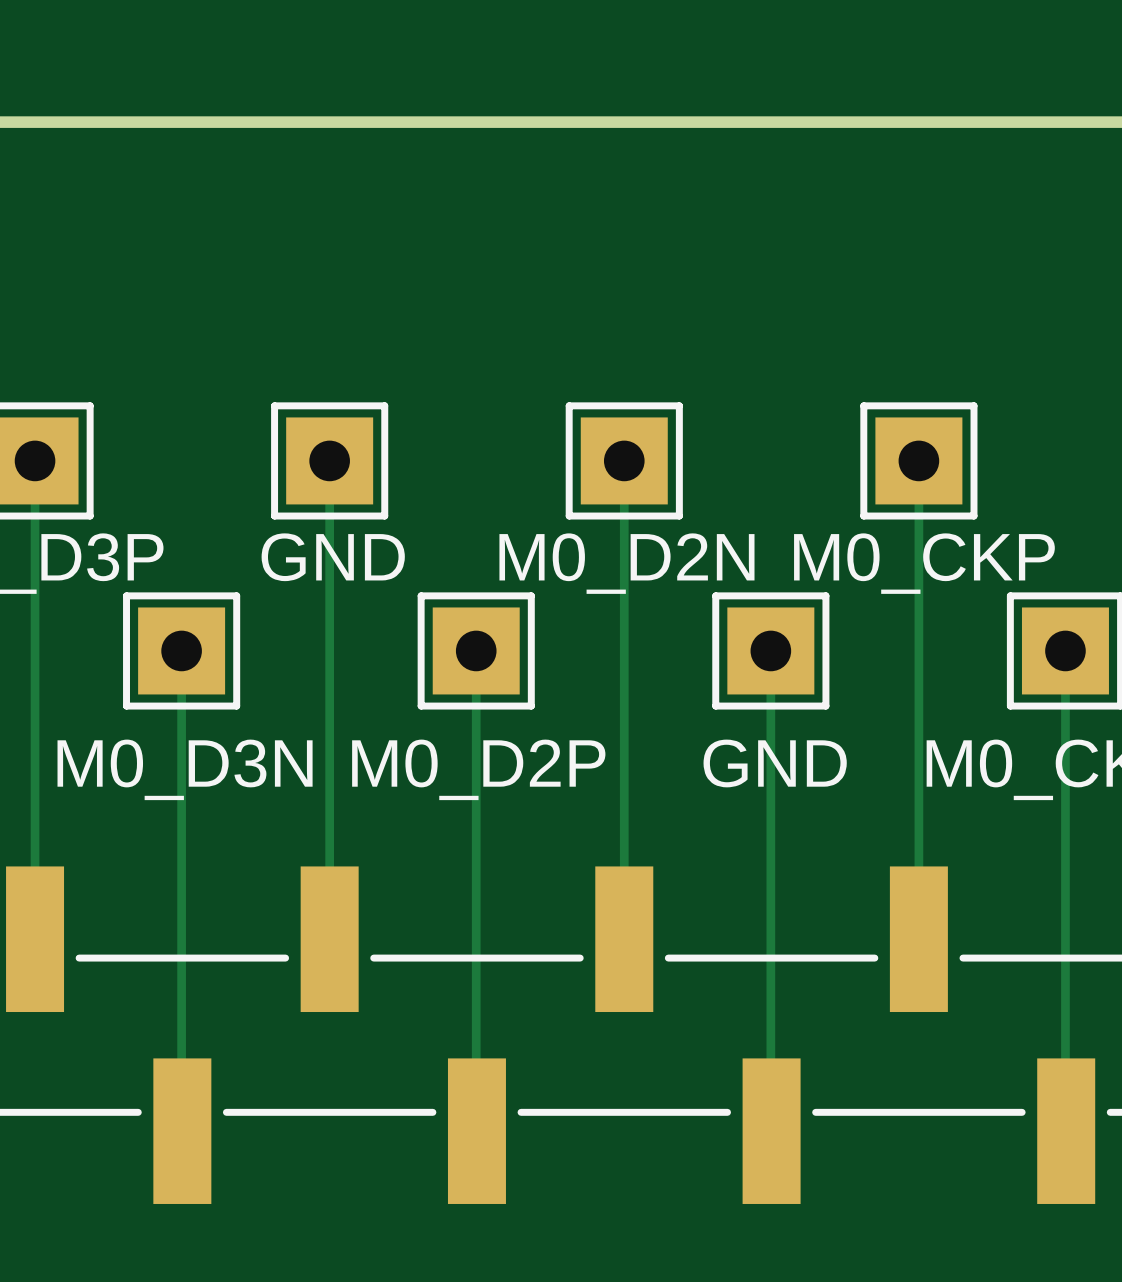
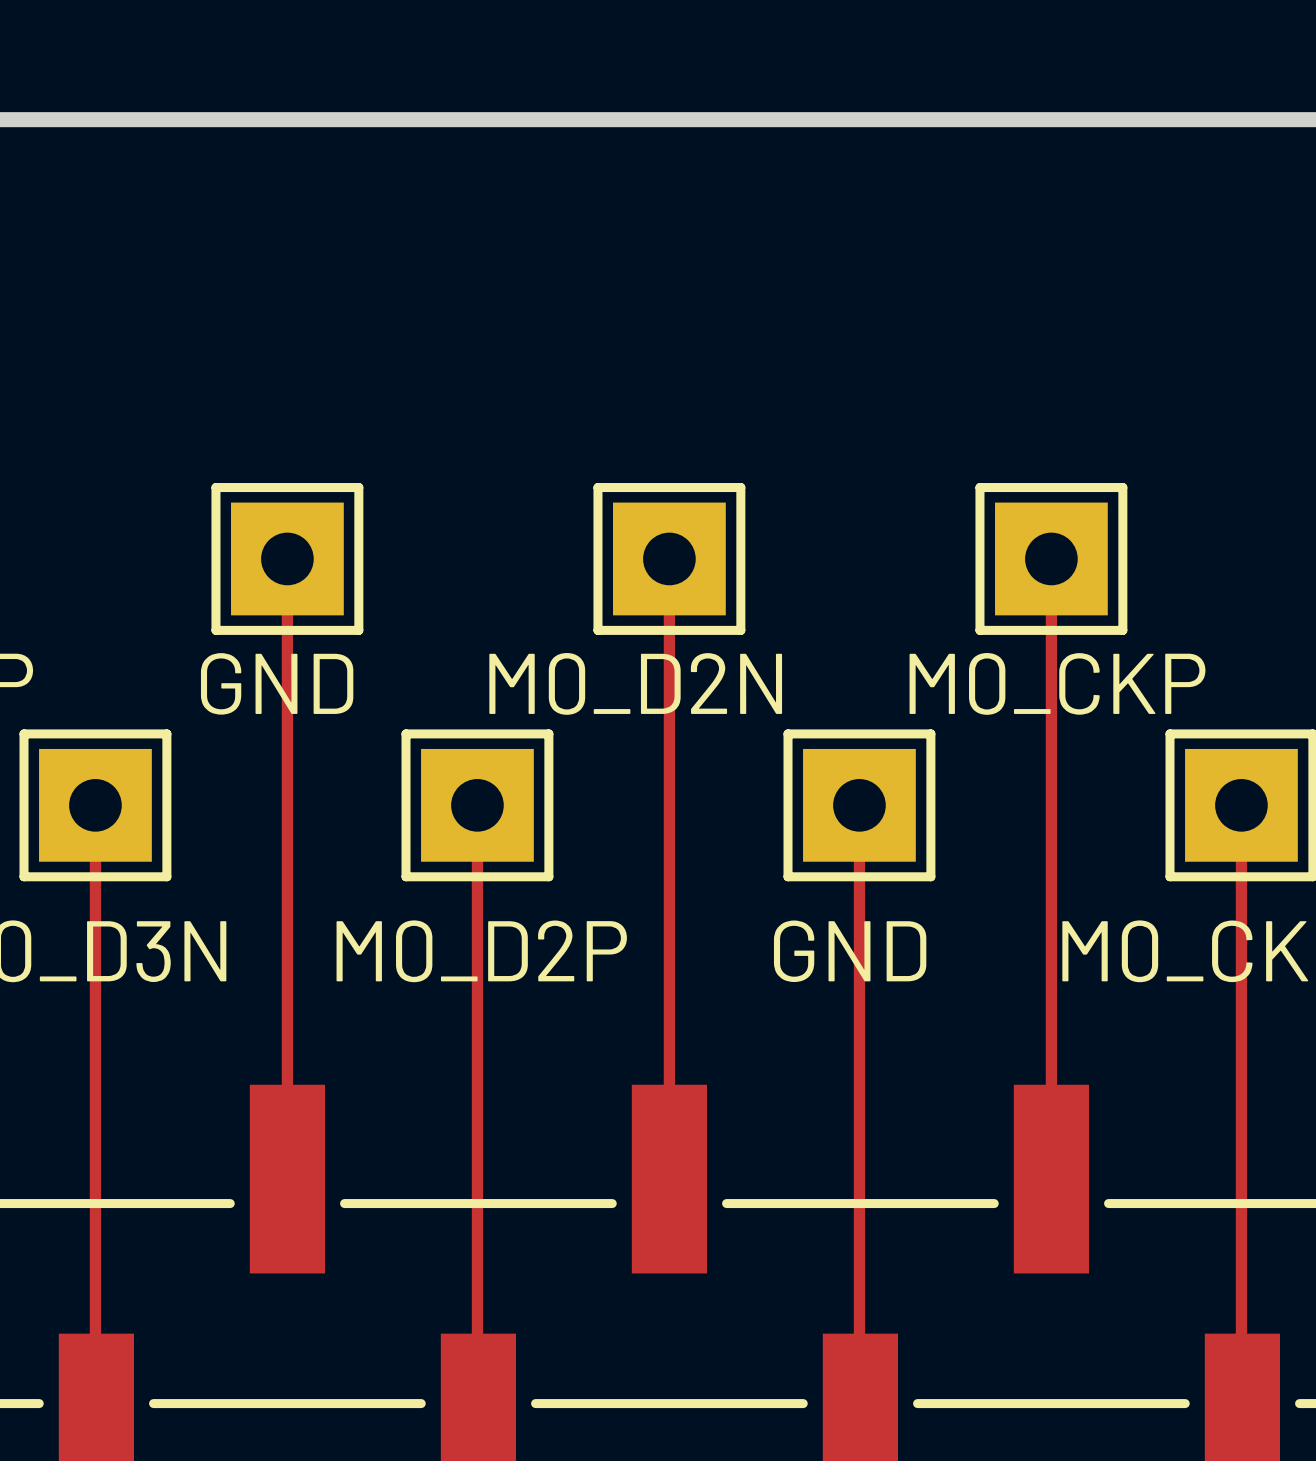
text position: M0_D2N (626, 563) -> M0_D2N (635, 683)
text position: M0_CKP (924, 563) -> M0_CKP (1057, 683)
text position: M0_D2P (478, 769) -> M0_D2P (481, 951)

